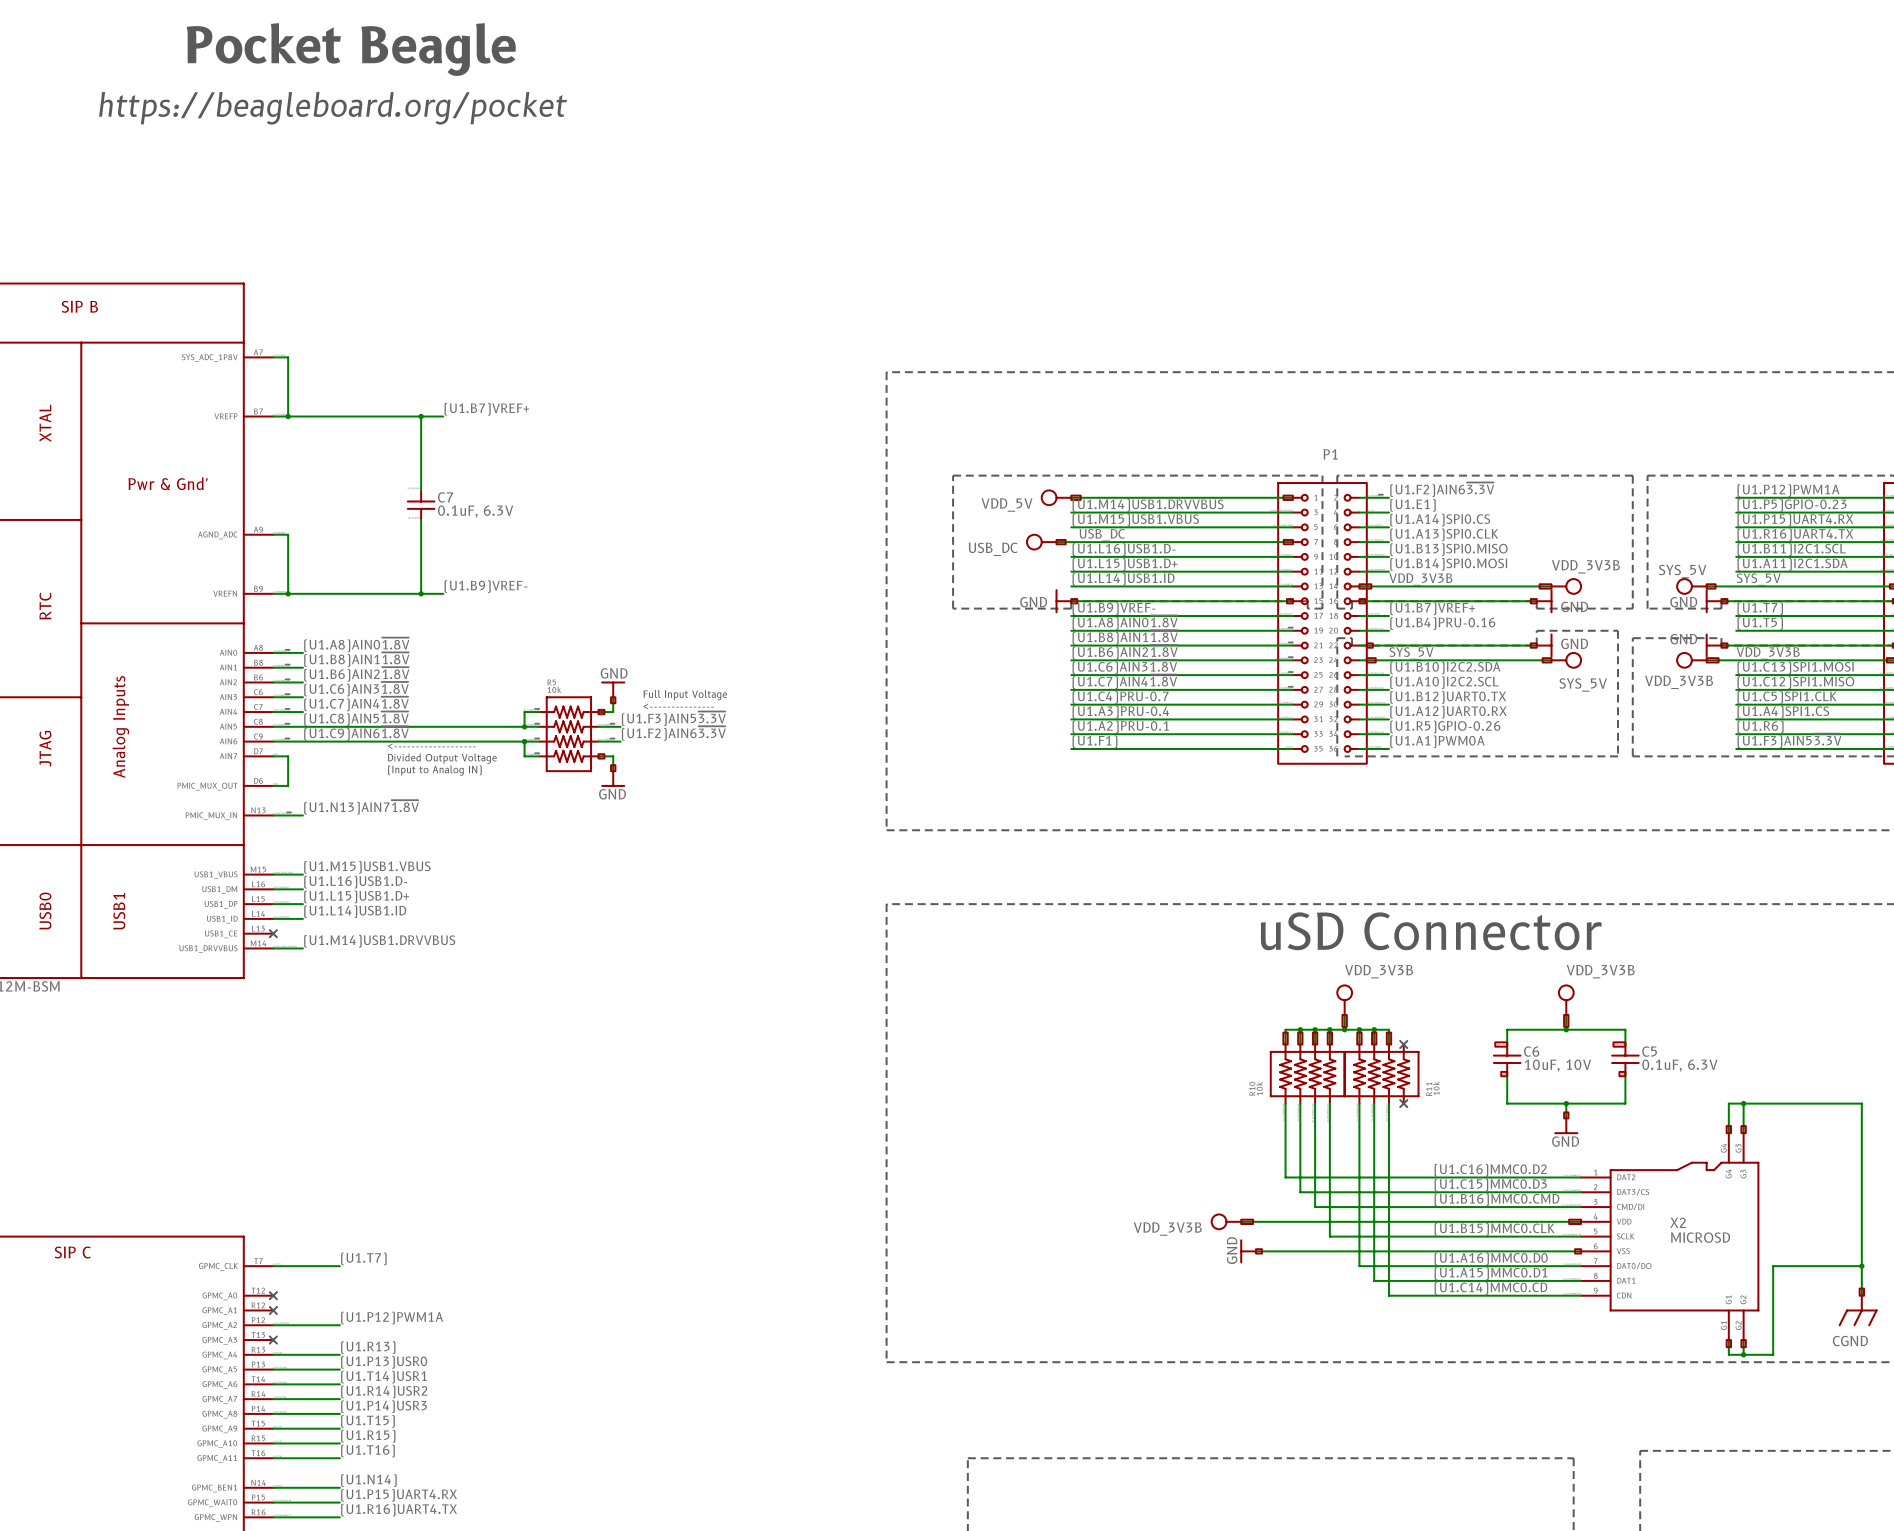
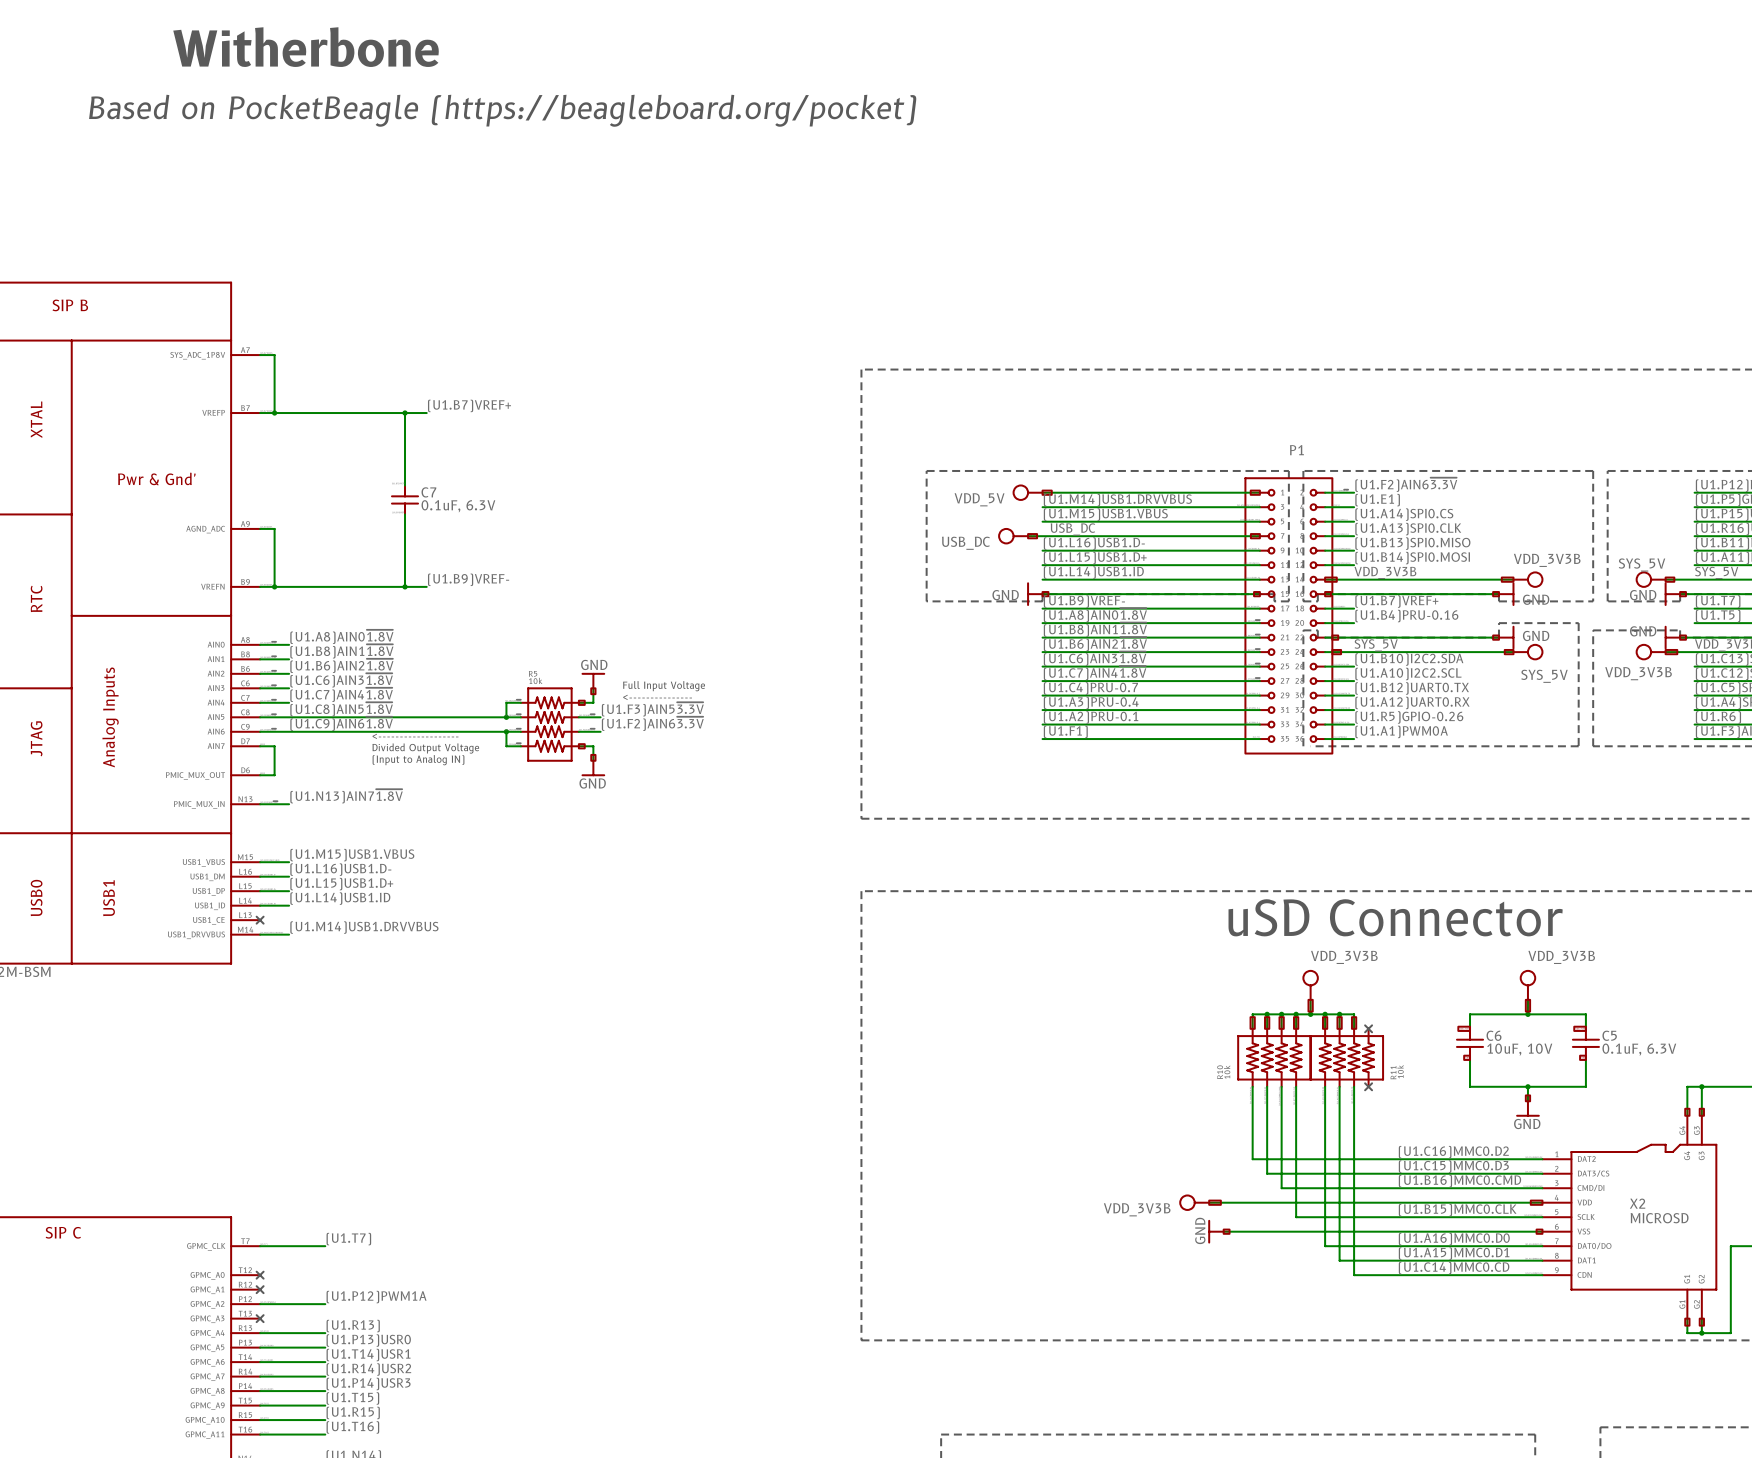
text: Pocket Beagle (351, 49) -> Witherbone (306, 47)
text: https://beagleboard.org/pocket (333, 108) -> Based on PocketBeagle (https://beagleboard.org/pocket) (502, 110)

